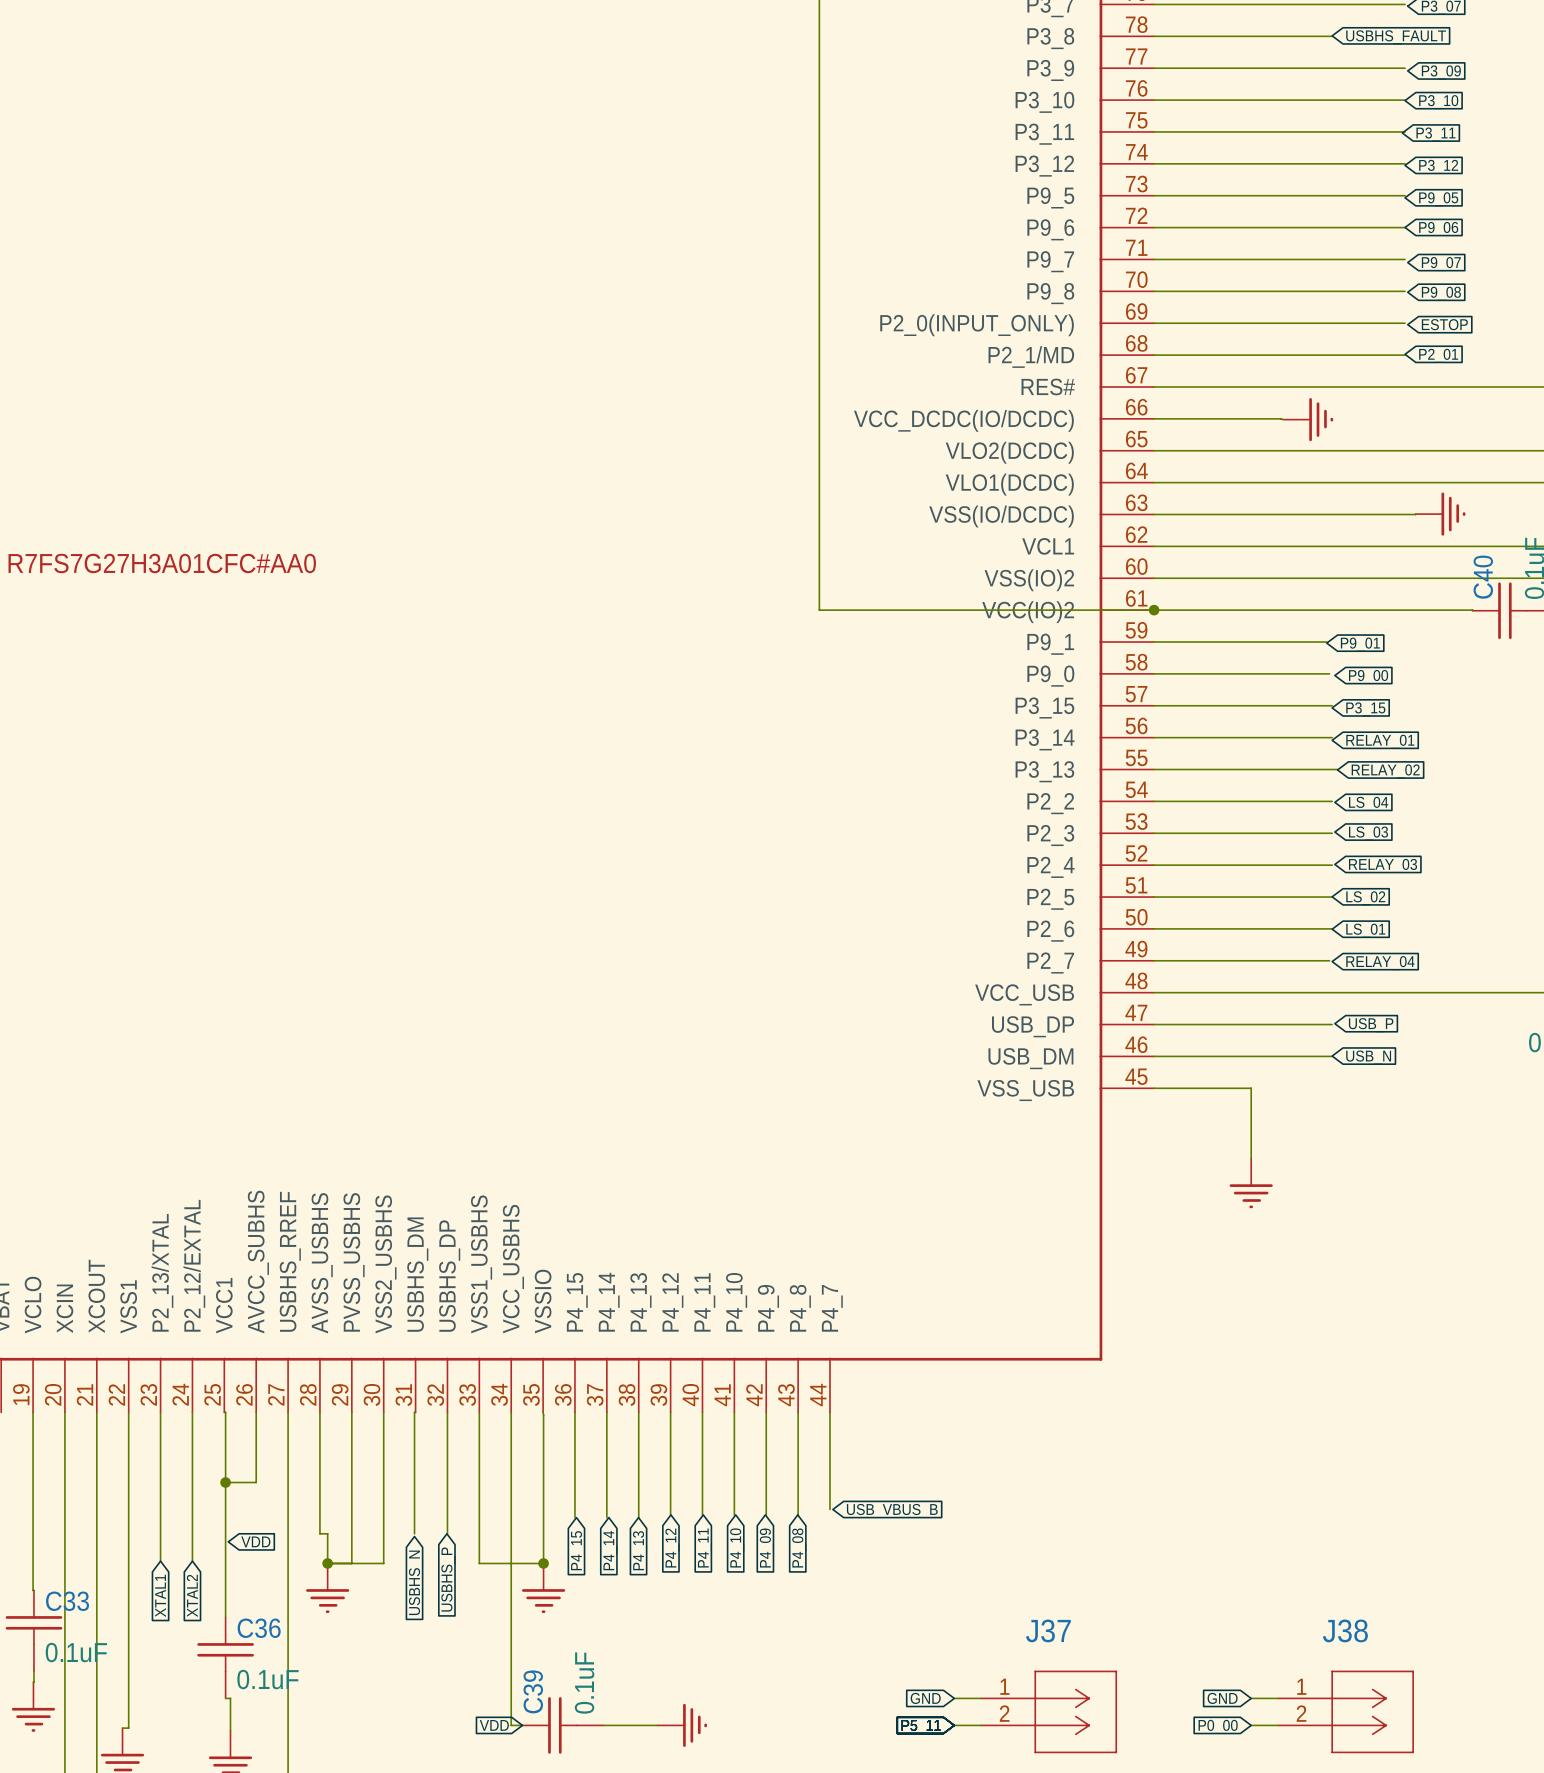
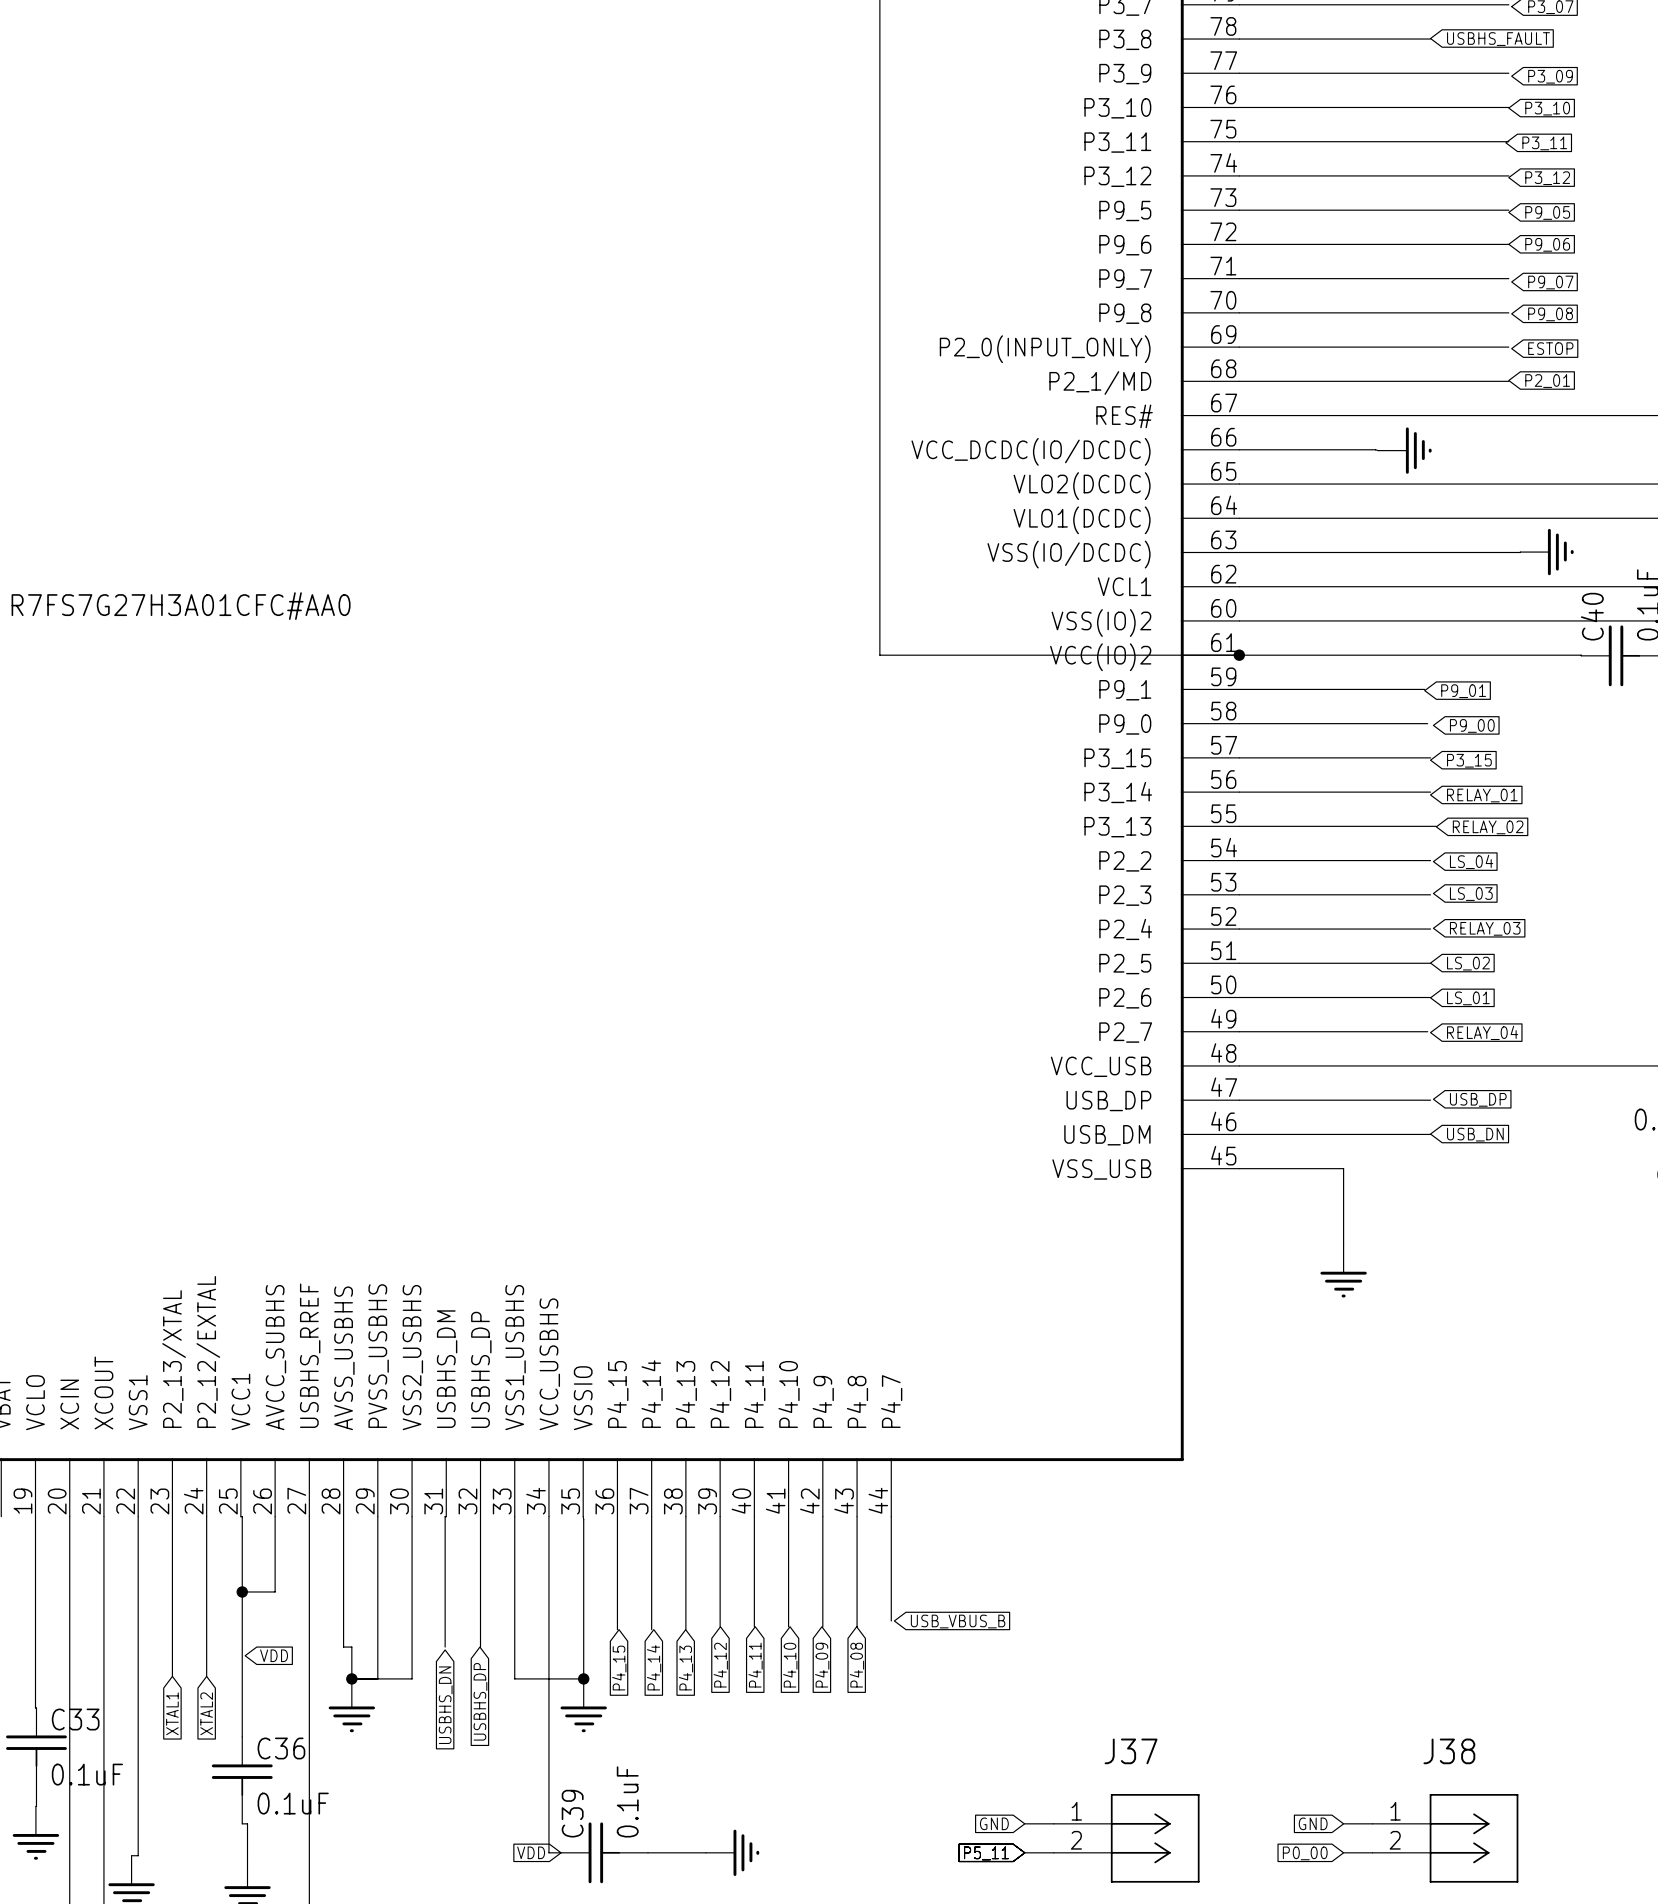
global label: USB_P (1371, 1025) -> USB_DP (1478, 1099)
global label: USB_N (1368, 1057) -> USB_DN (1475, 1134)
global label: USBHS_P (448, 1579) -> USBHS_DP (480, 1701)
global label: USBHS_N (416, 1582) -> USBHS_DN (445, 1705)

